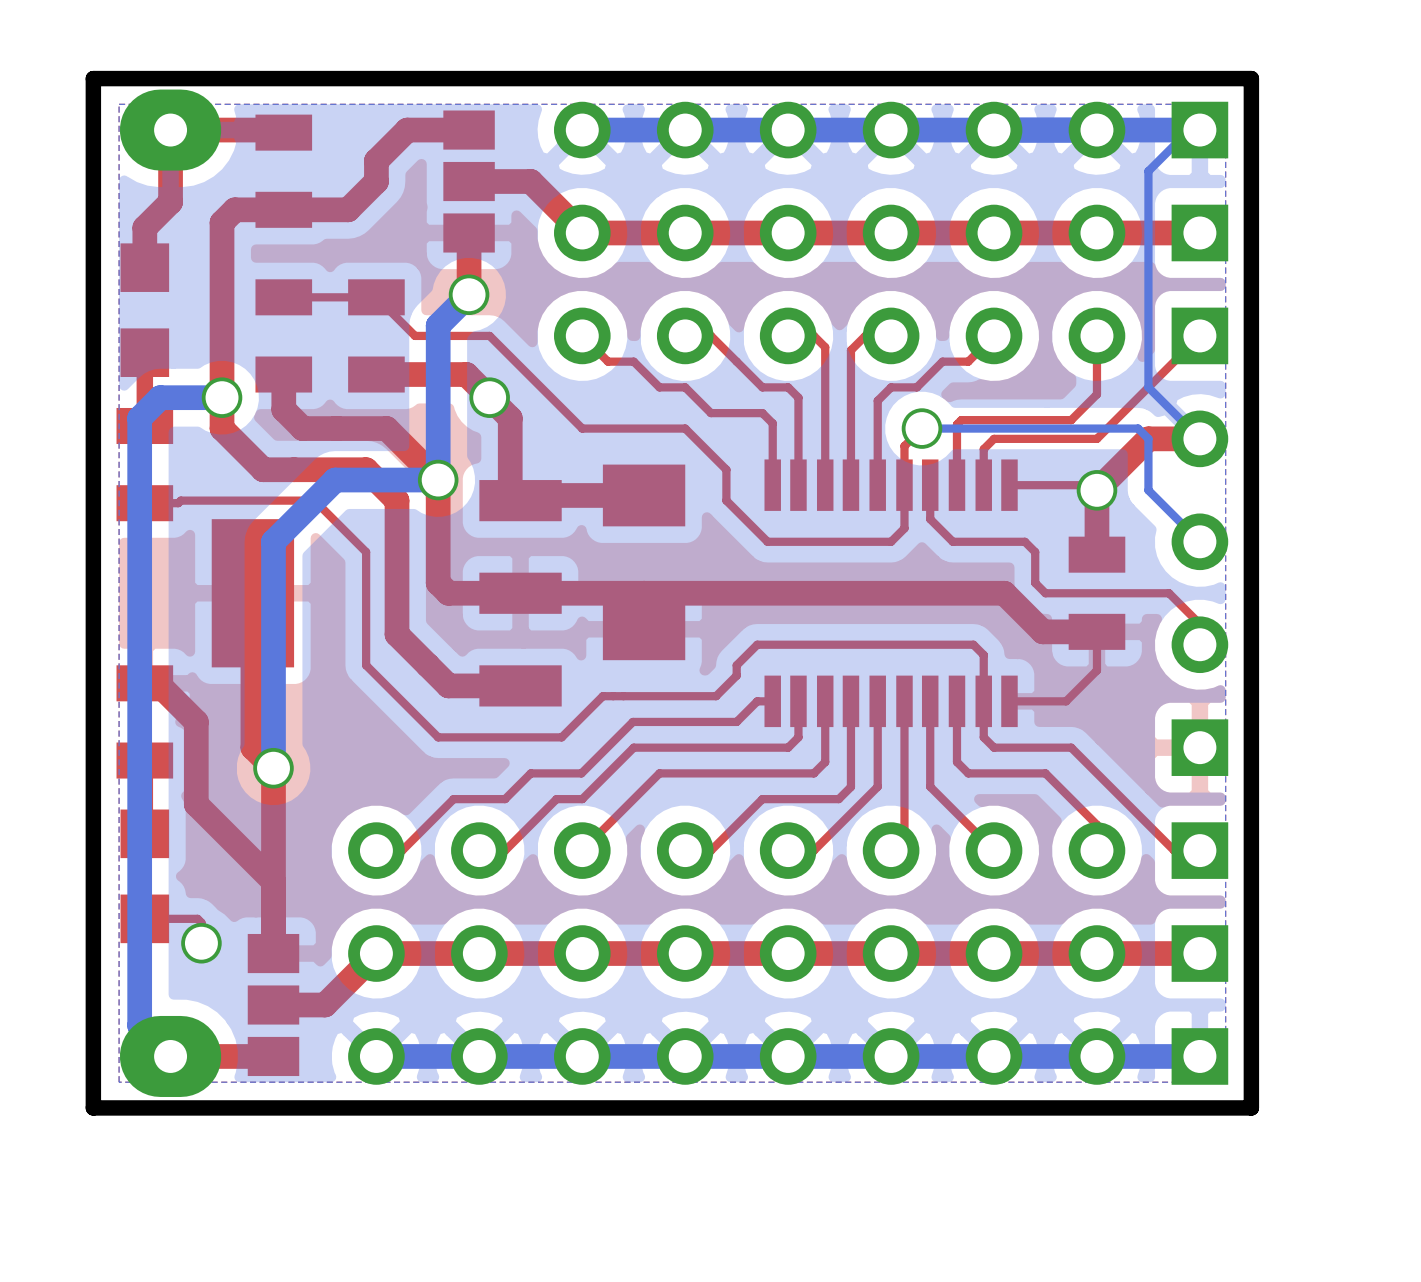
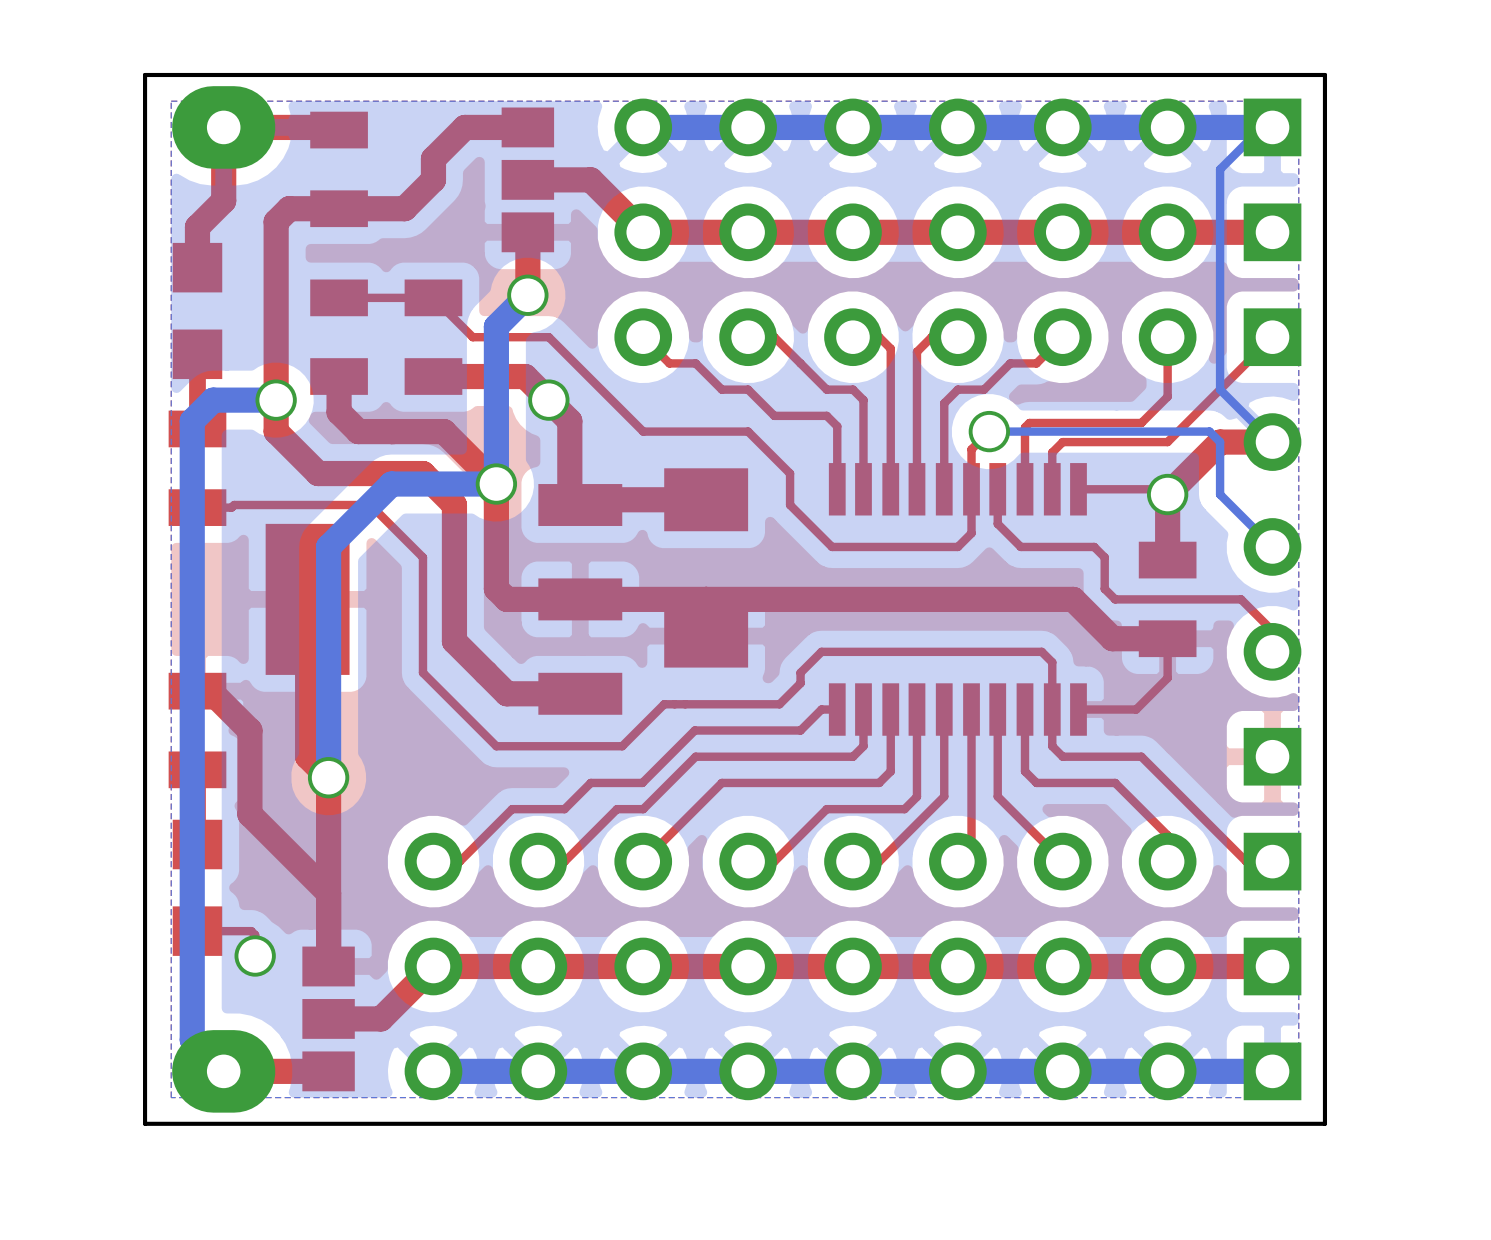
board edge width: thick (1251, 78) (1251, 1107) (93, 1107) (93, 78) (1251, 78) -> thin (1324, 74) (1324, 1123) (145, 1123) (145, 74) (1324, 74)

